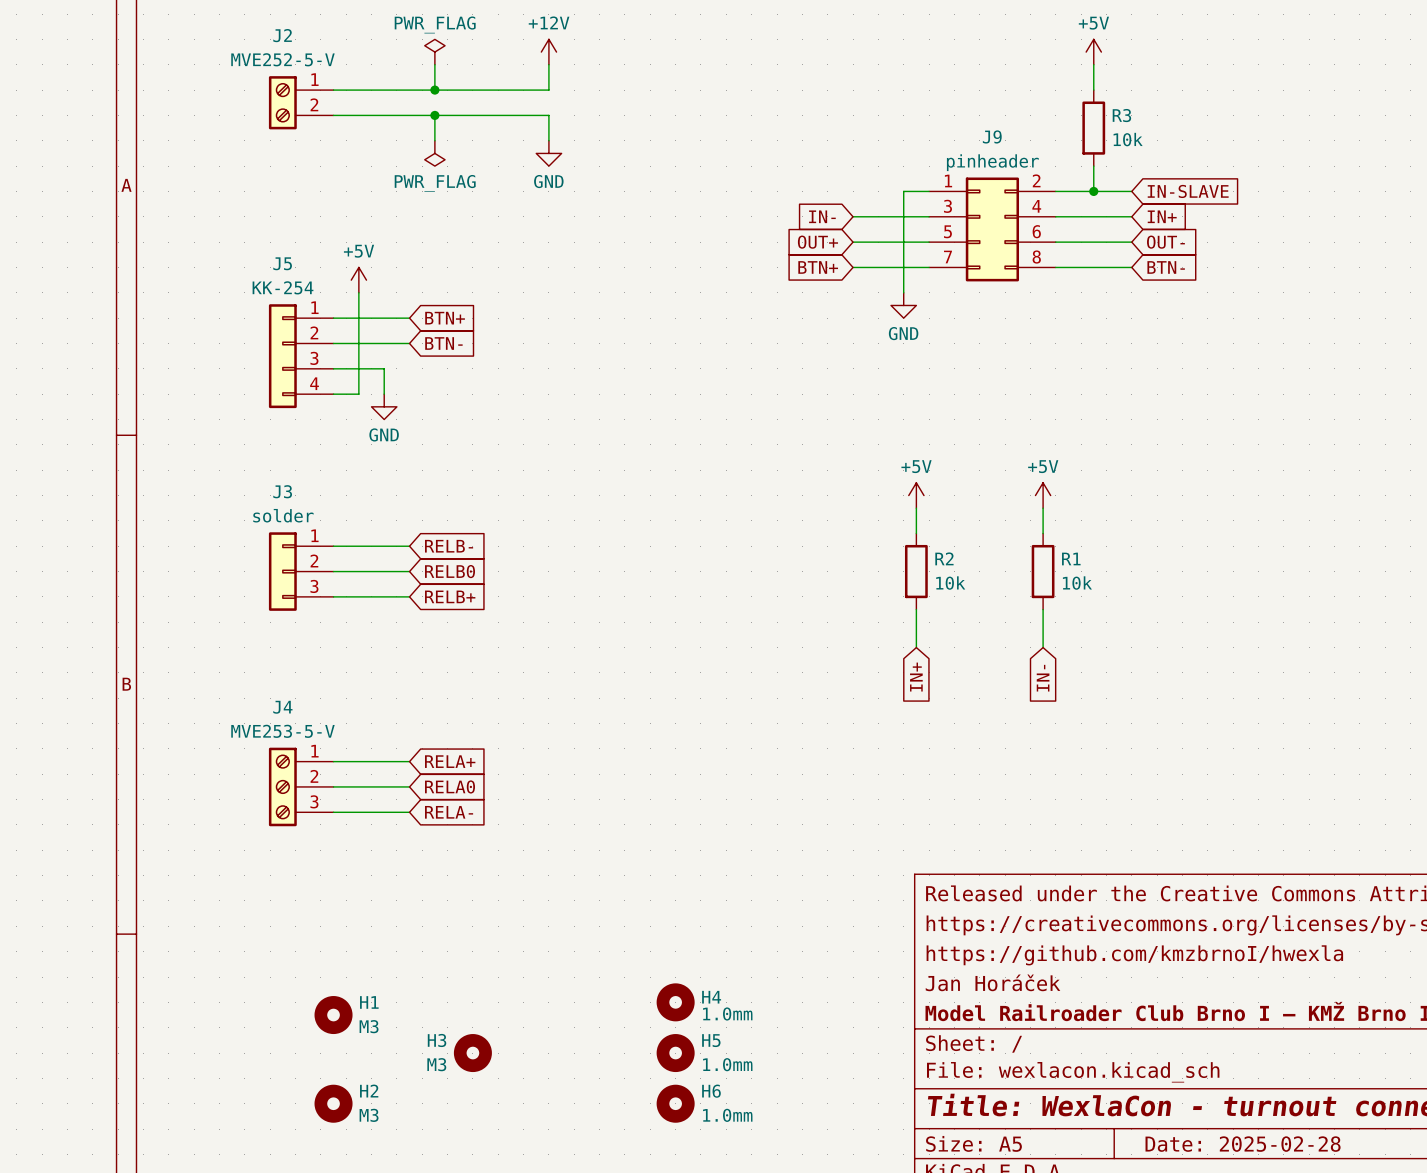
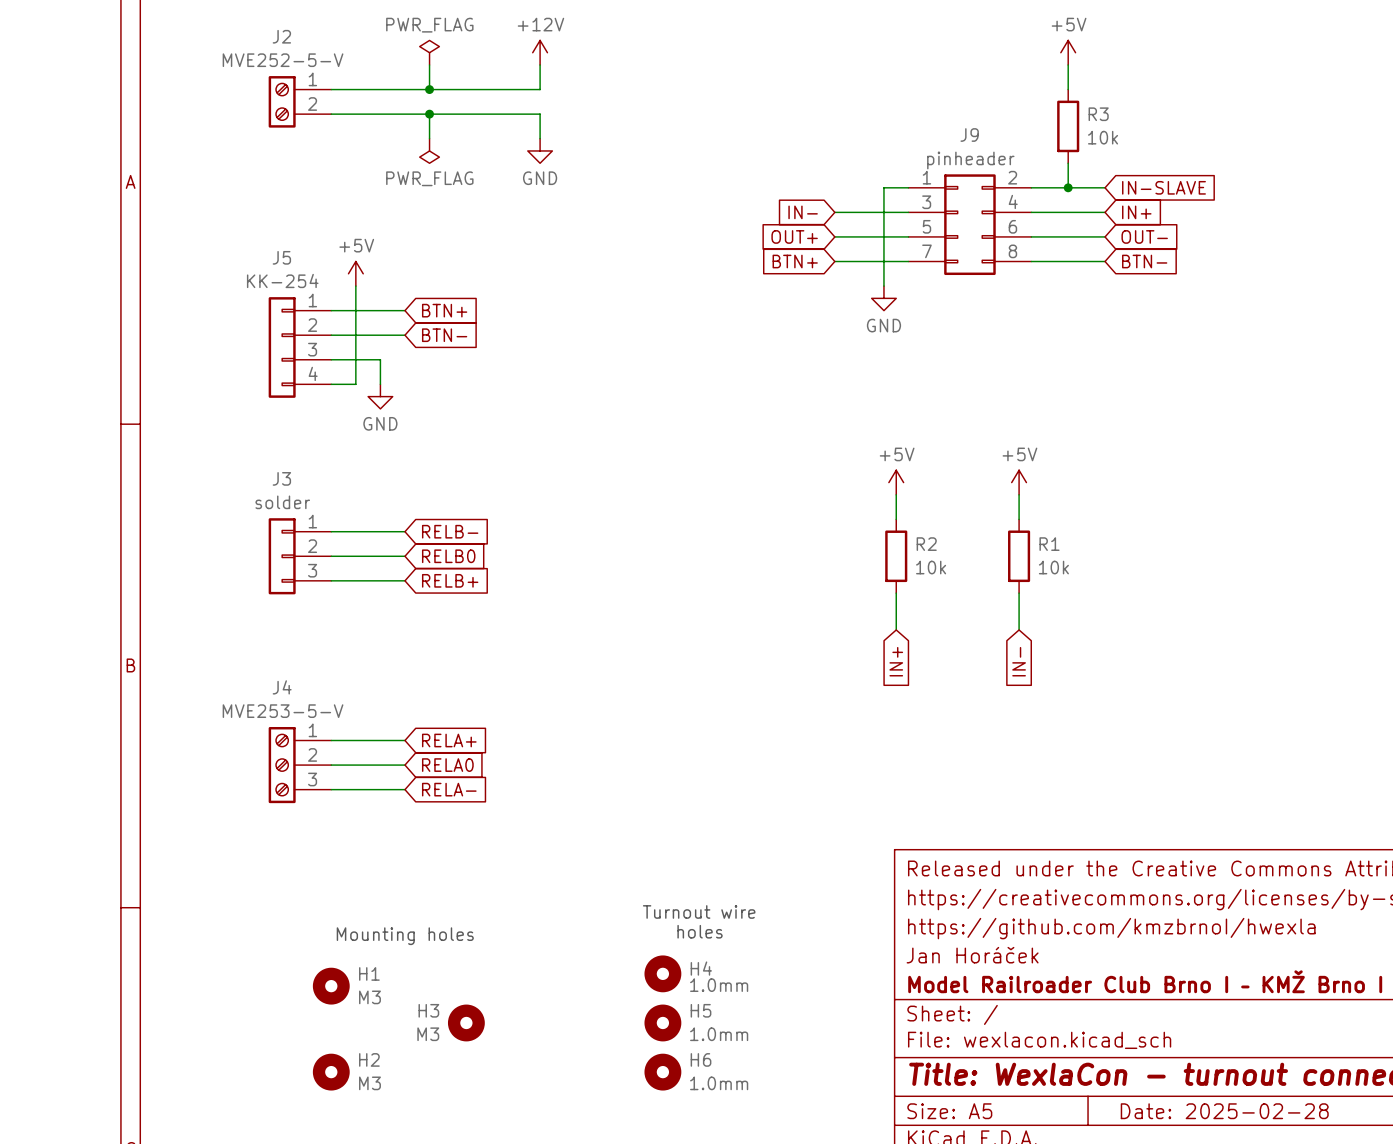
text: none -> Turnout wire (699, 911)
text: none -> holes (700, 931)
text: none -> Mounting holes (405, 936)

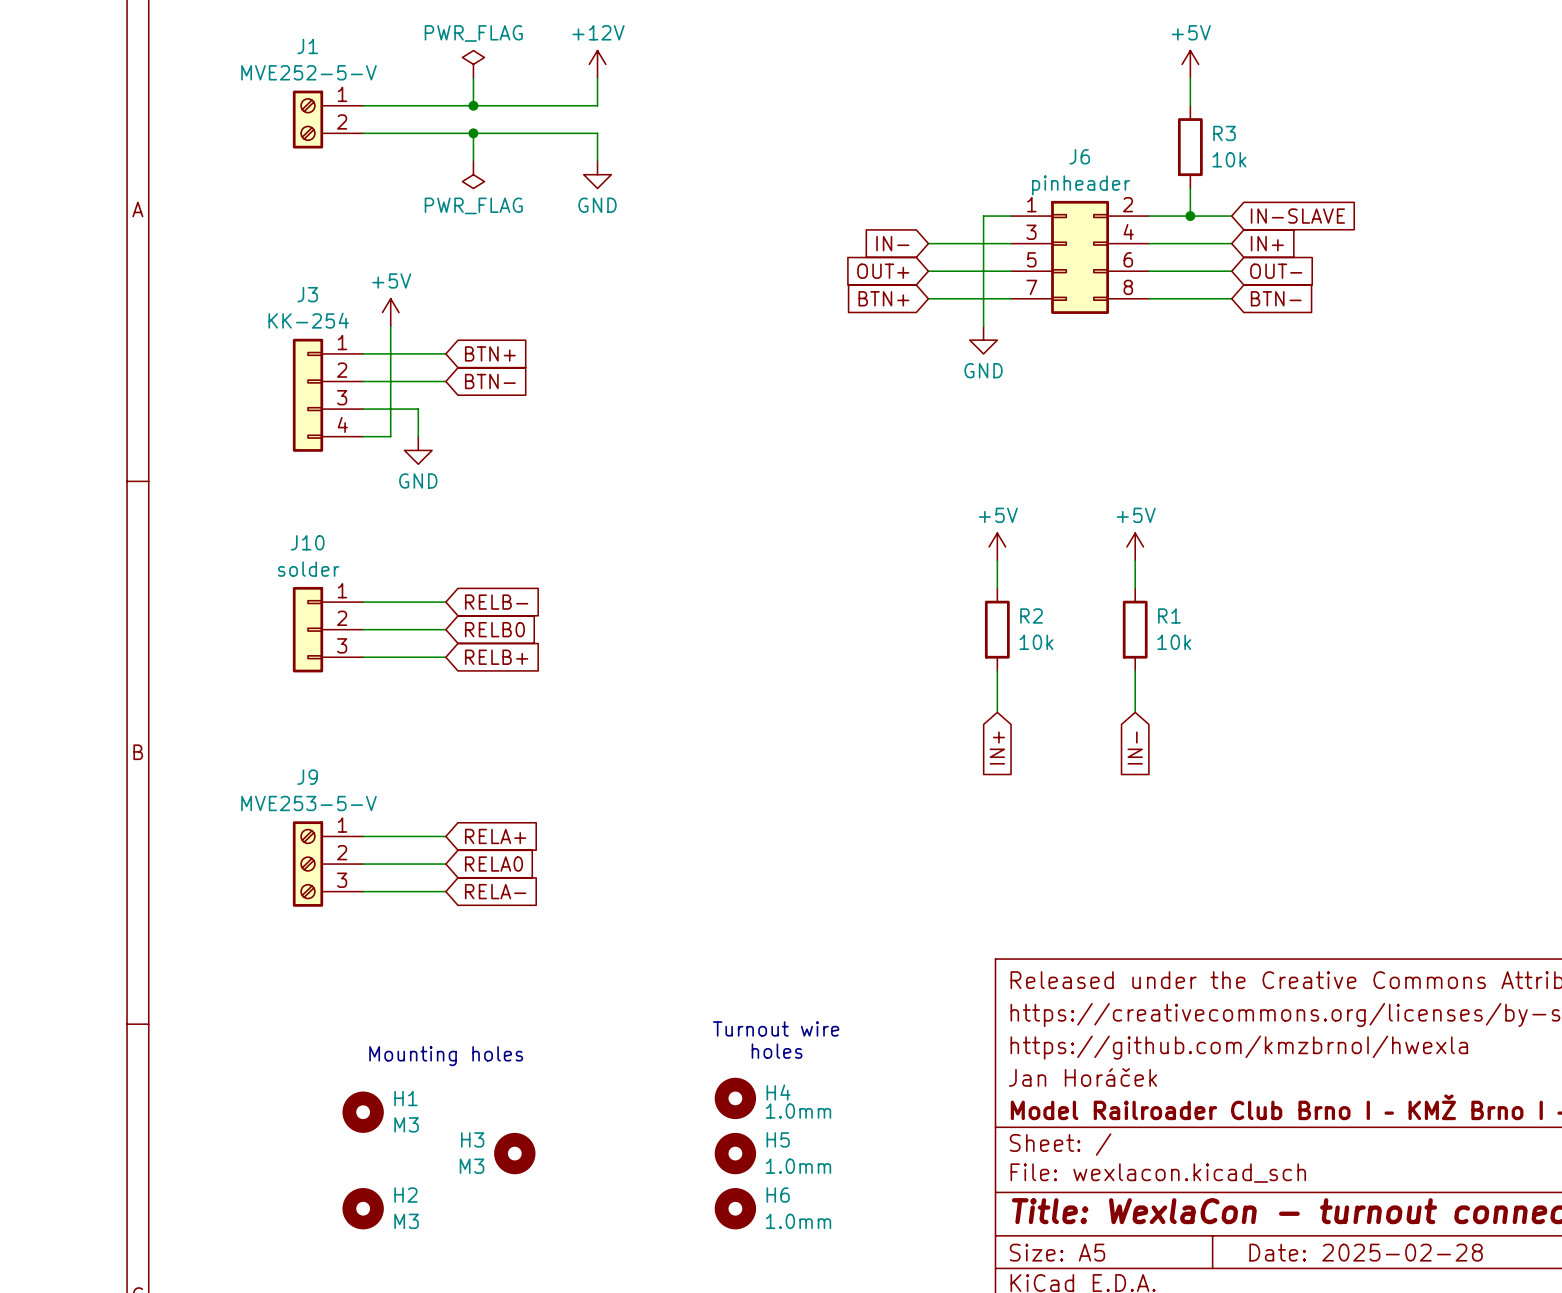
J2 name: J2 (281, 36) -> J1 (307, 46)
J9 name: J9 (969, 135) -> J6 (1079, 156)
J5 name: J5 (281, 257) -> J3 (307, 294)
J3 name: J3 (281, 478) -> J10 (307, 542)
J4 name: J4 (282, 687) -> J9 (307, 777)

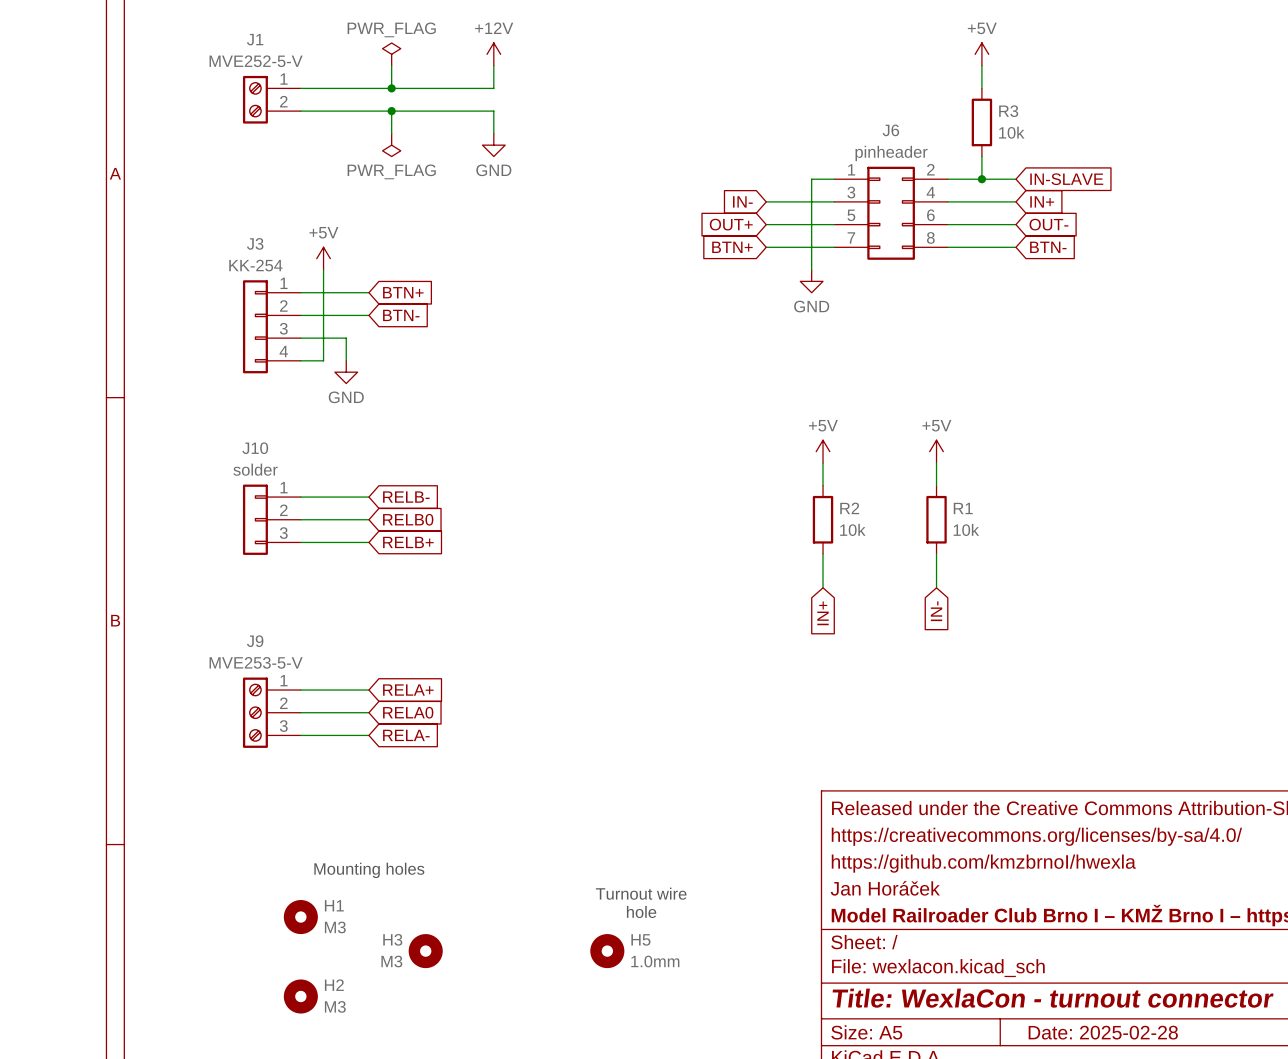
text position: Turnout wire (776, 1028) -> Turnout wire (641, 893)
text: holes (777, 1051) -> none
H4: 1.0mm (735, 1098) -> none
text: none -> hole (641, 911)
H6: 1.0mm (735, 1208) -> none

